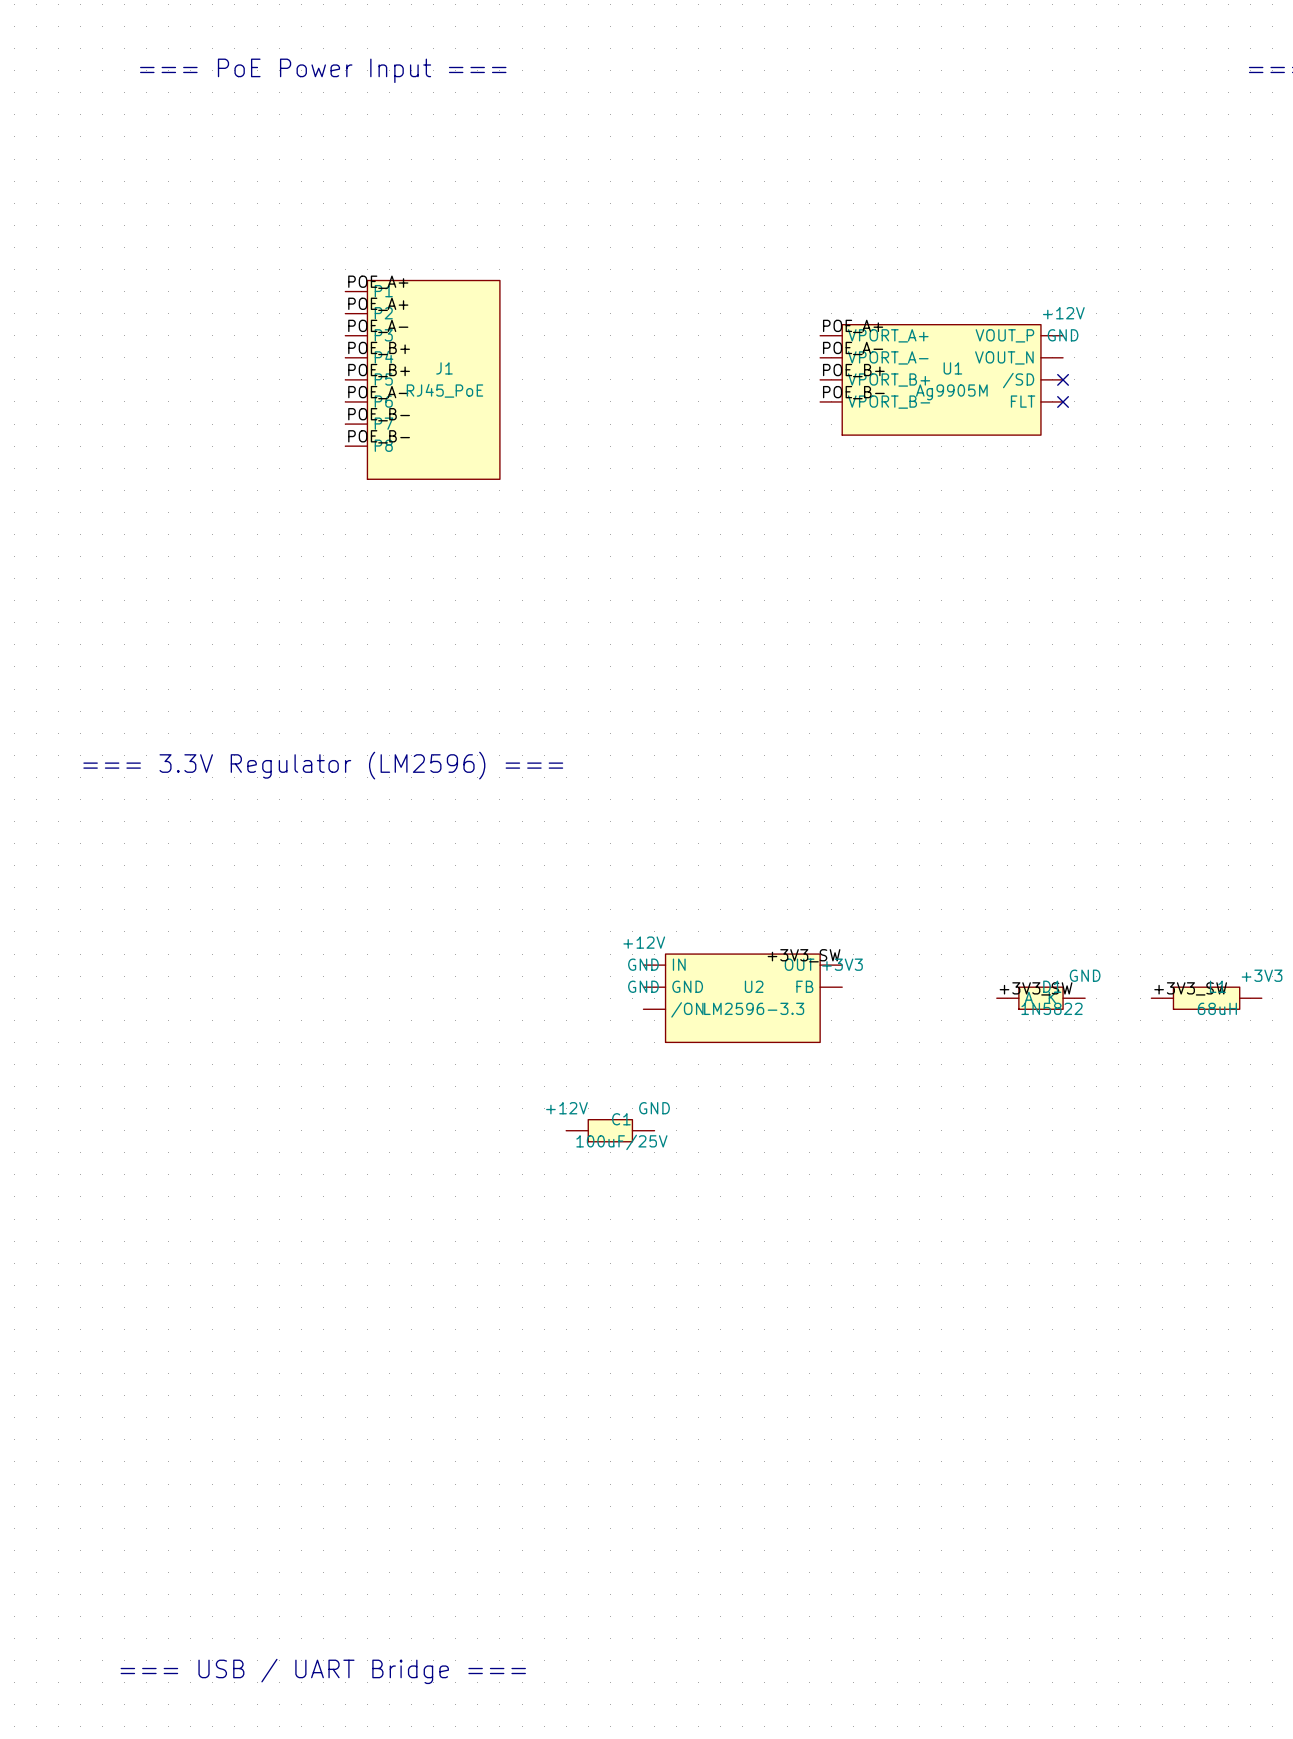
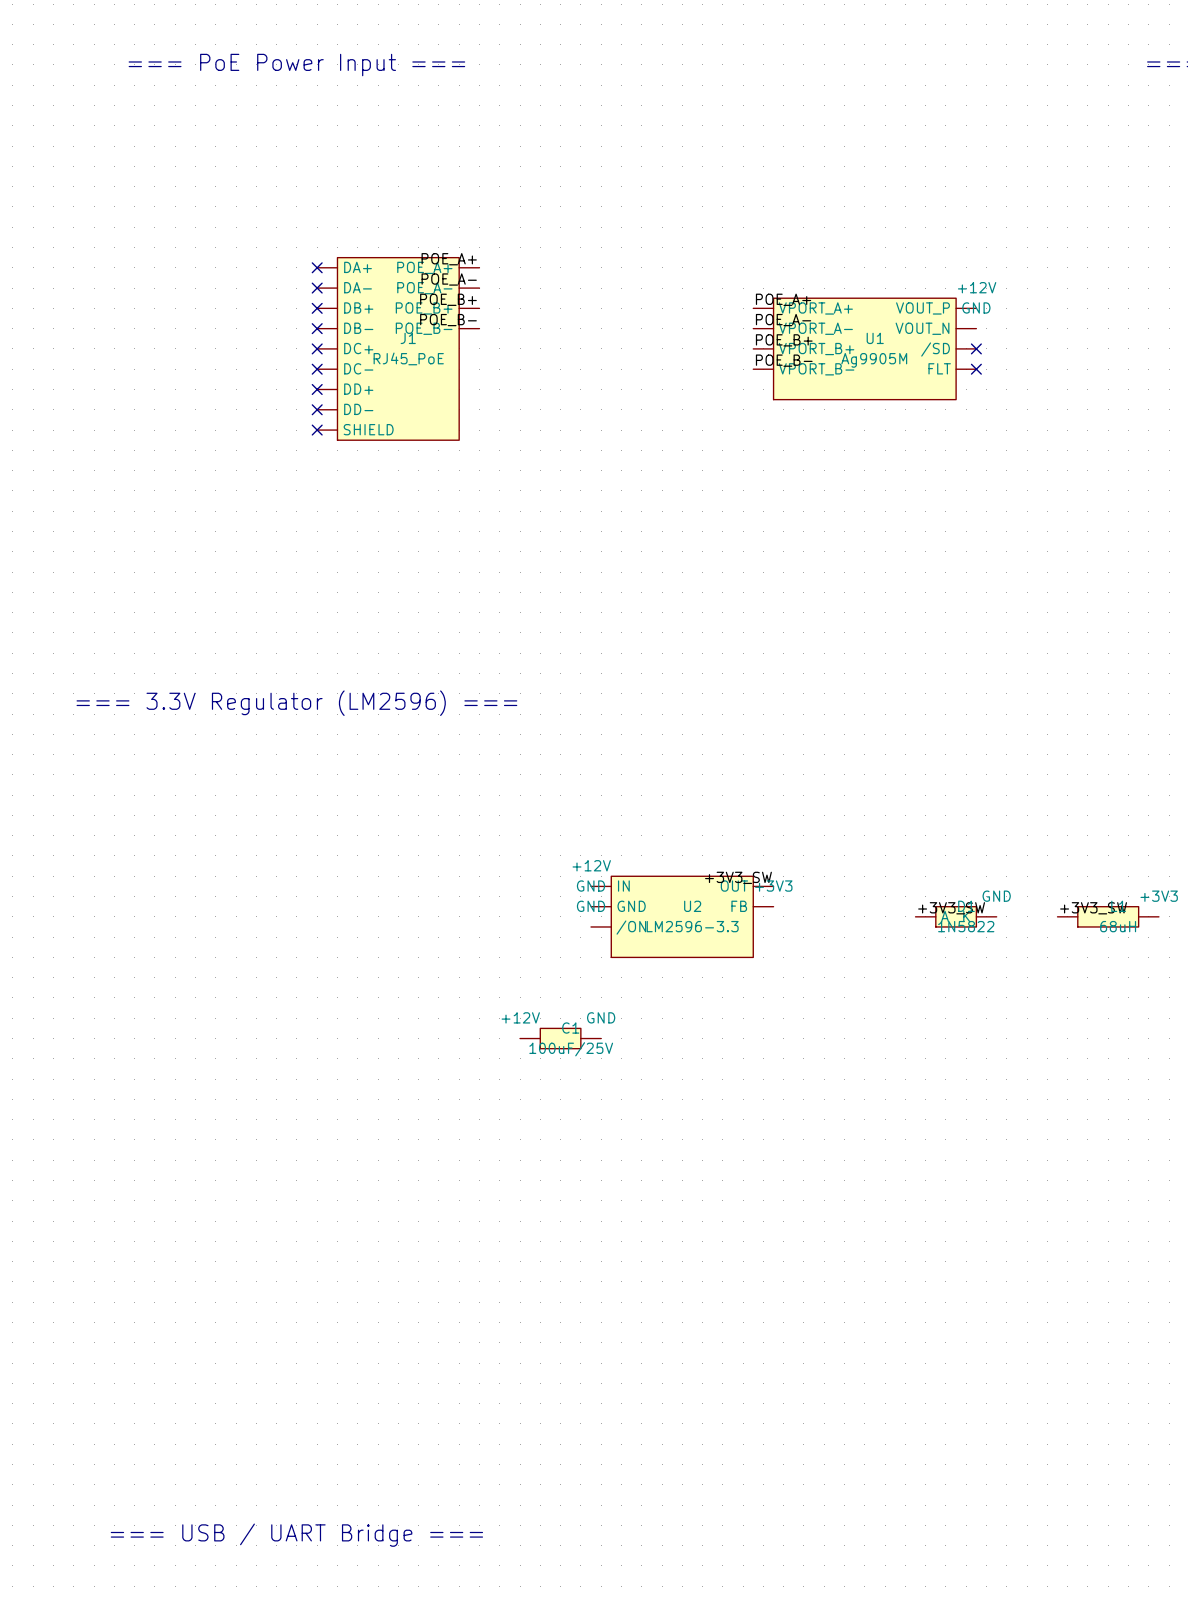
J1 symbol: [345, 280, 500, 480] -> [317, 257, 480, 441]
label: POE_A+ (378, 282) -> none
label: none -> POE_A+ (449, 259)
no-connect mark: none -> (317, 267)
label: POE_A+ (378, 304) -> none
label: none -> POE_A- (449, 279)
no-connect mark: none -> (317, 288)
label: POE_A- (378, 326) -> none
label: none -> POE_B+ (448, 299)
no-connect mark: none -> (317, 308)
label: POE_B+ (379, 348) -> none
label: none -> POE_B- (448, 320)
no-connect mark: none -> (317, 328)
label: POE_B+ (379, 370) -> none
no-connect mark: none -> (317, 348)
label: POE_A- (378, 392) -> none
no-connect mark: none -> (317, 369)
label: POE_B- (379, 414) -> none
no-connect mark: none -> (317, 389)
label: POE_B- (379, 436) -> none
no-connect mark: none -> (317, 409)
no-connect mark: none -> (317, 430)

